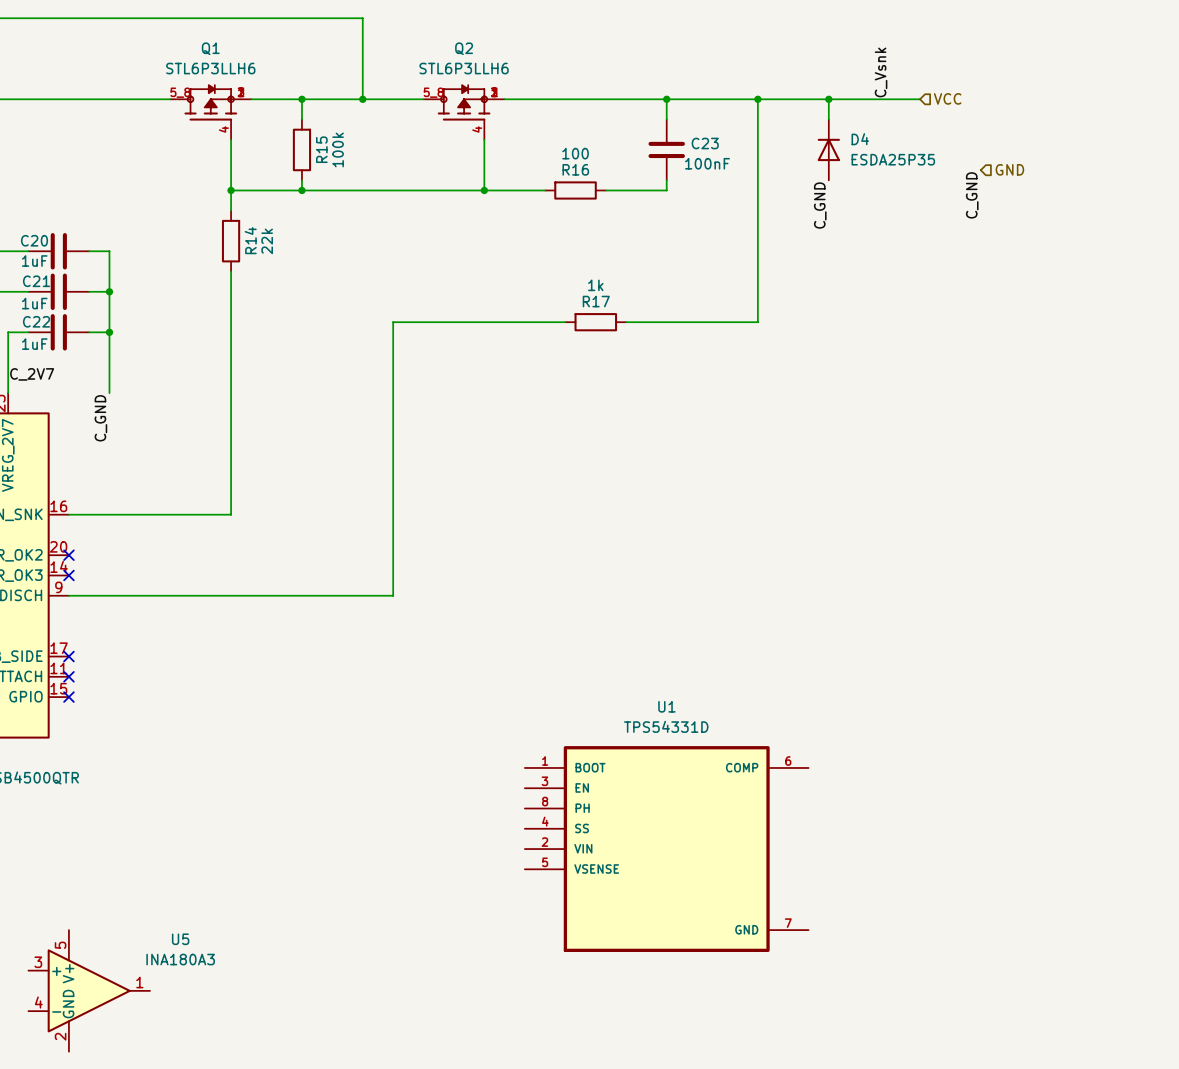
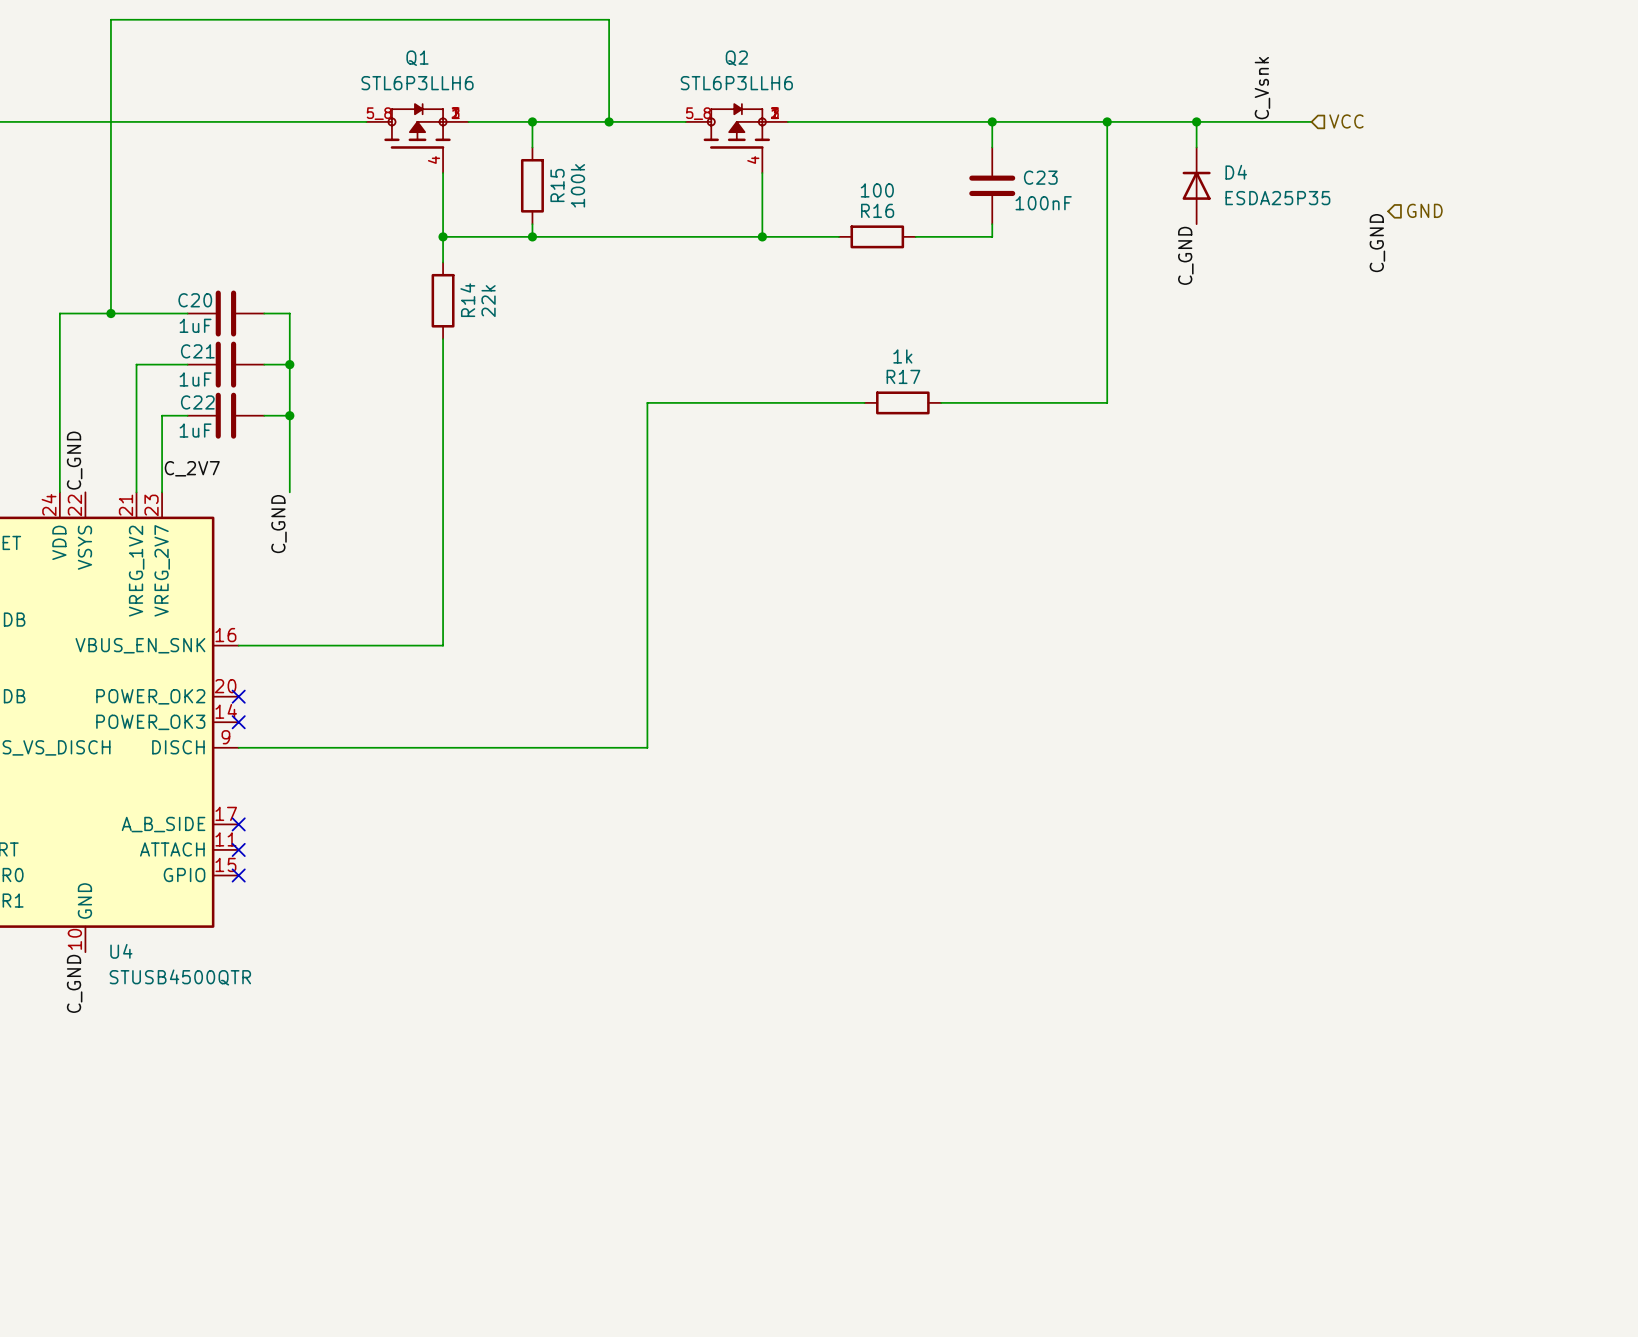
U1: TPS54331D (666, 849) -> none
U5: INA180A3 (89, 990) -> none

